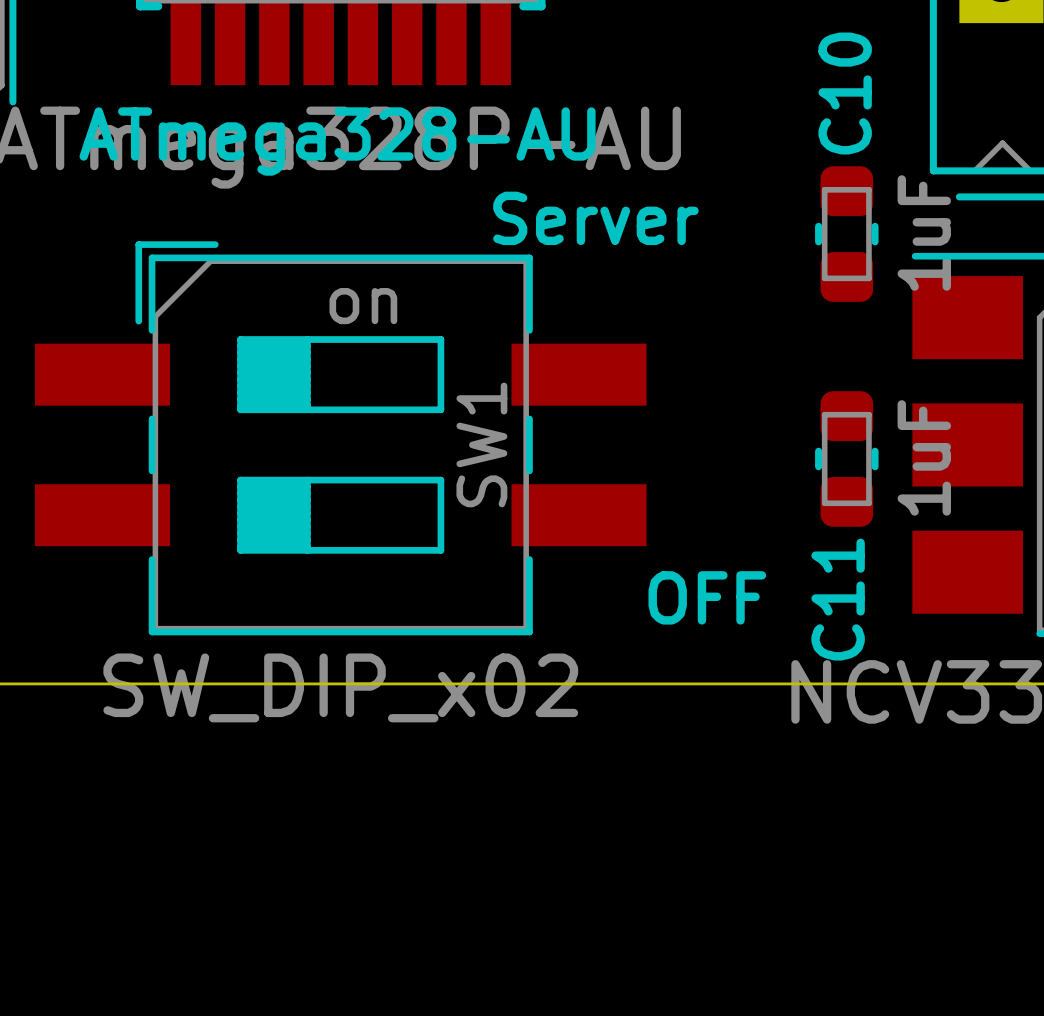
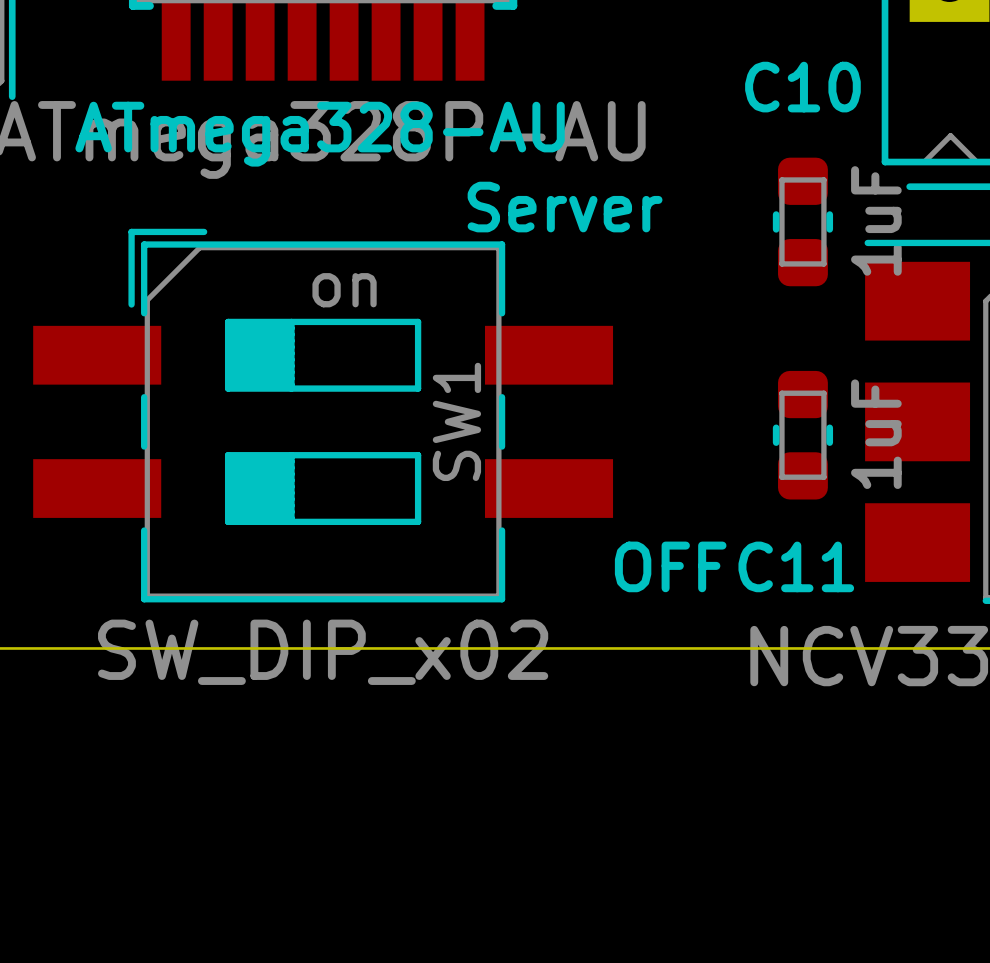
C10 name rotation: 0° (845, 93) -> 90° clockwise (802, 87)
C11 name rotation: 0° (838, 599) -> 90° clockwise (796, 566)

